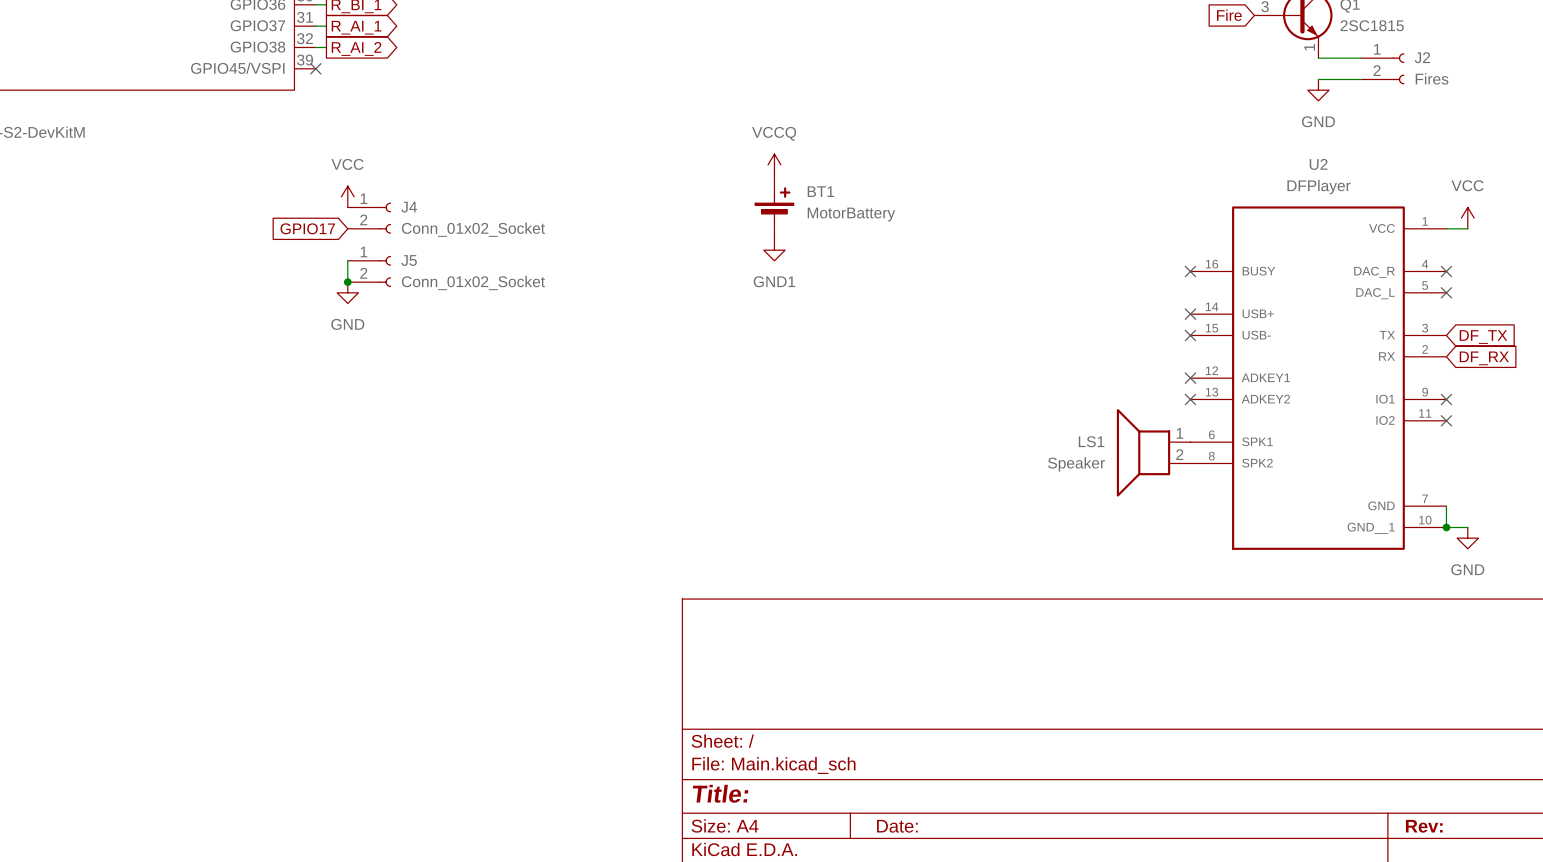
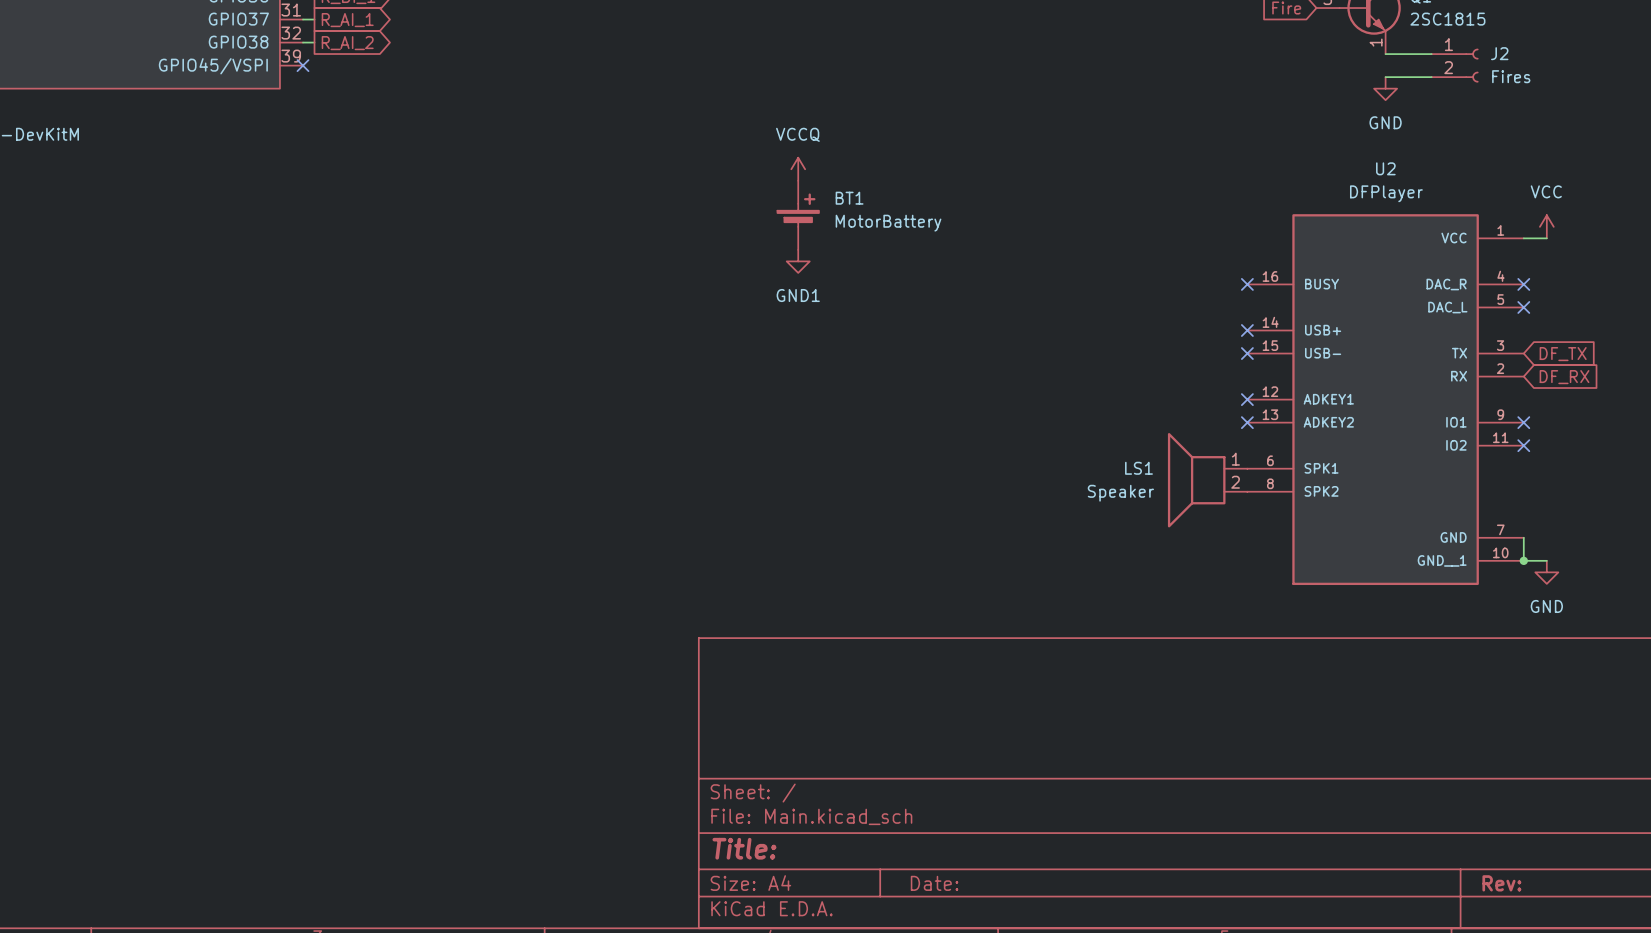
power symbol: VCC (347, 196) -> none
J4: Conn_01x02_Socket (369, 218) -> none
global label: GPIO17 (307, 228) -> none
wire: (347, 260) (347, 282) -> none
J5: Conn_01x02_Socket (369, 271) -> none
junction: (347, 282) -> none
power symbol: GND (347, 292) -> none

